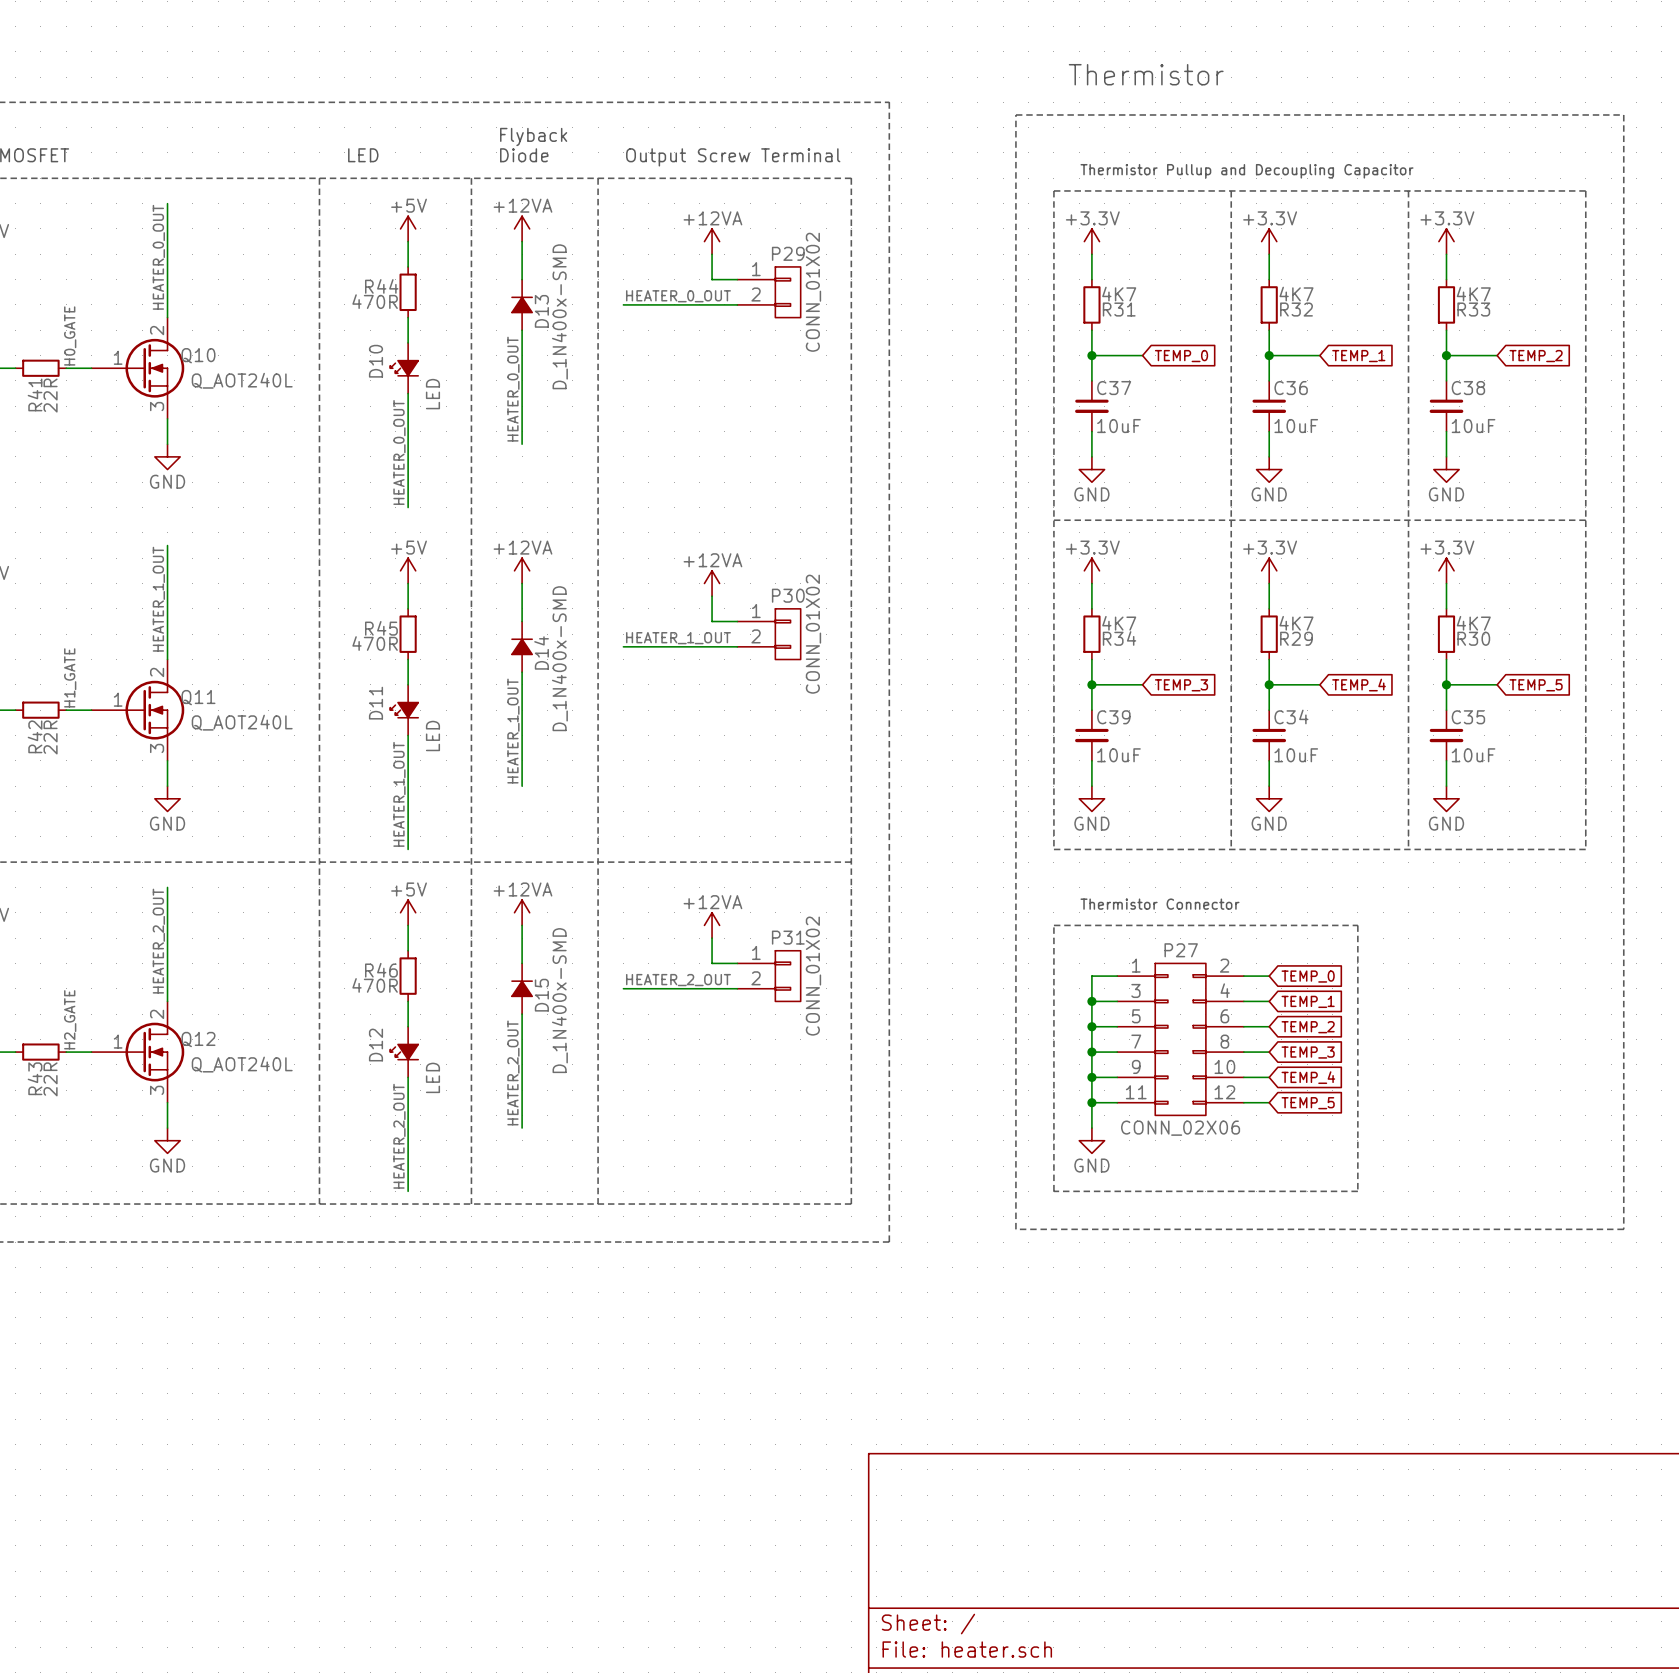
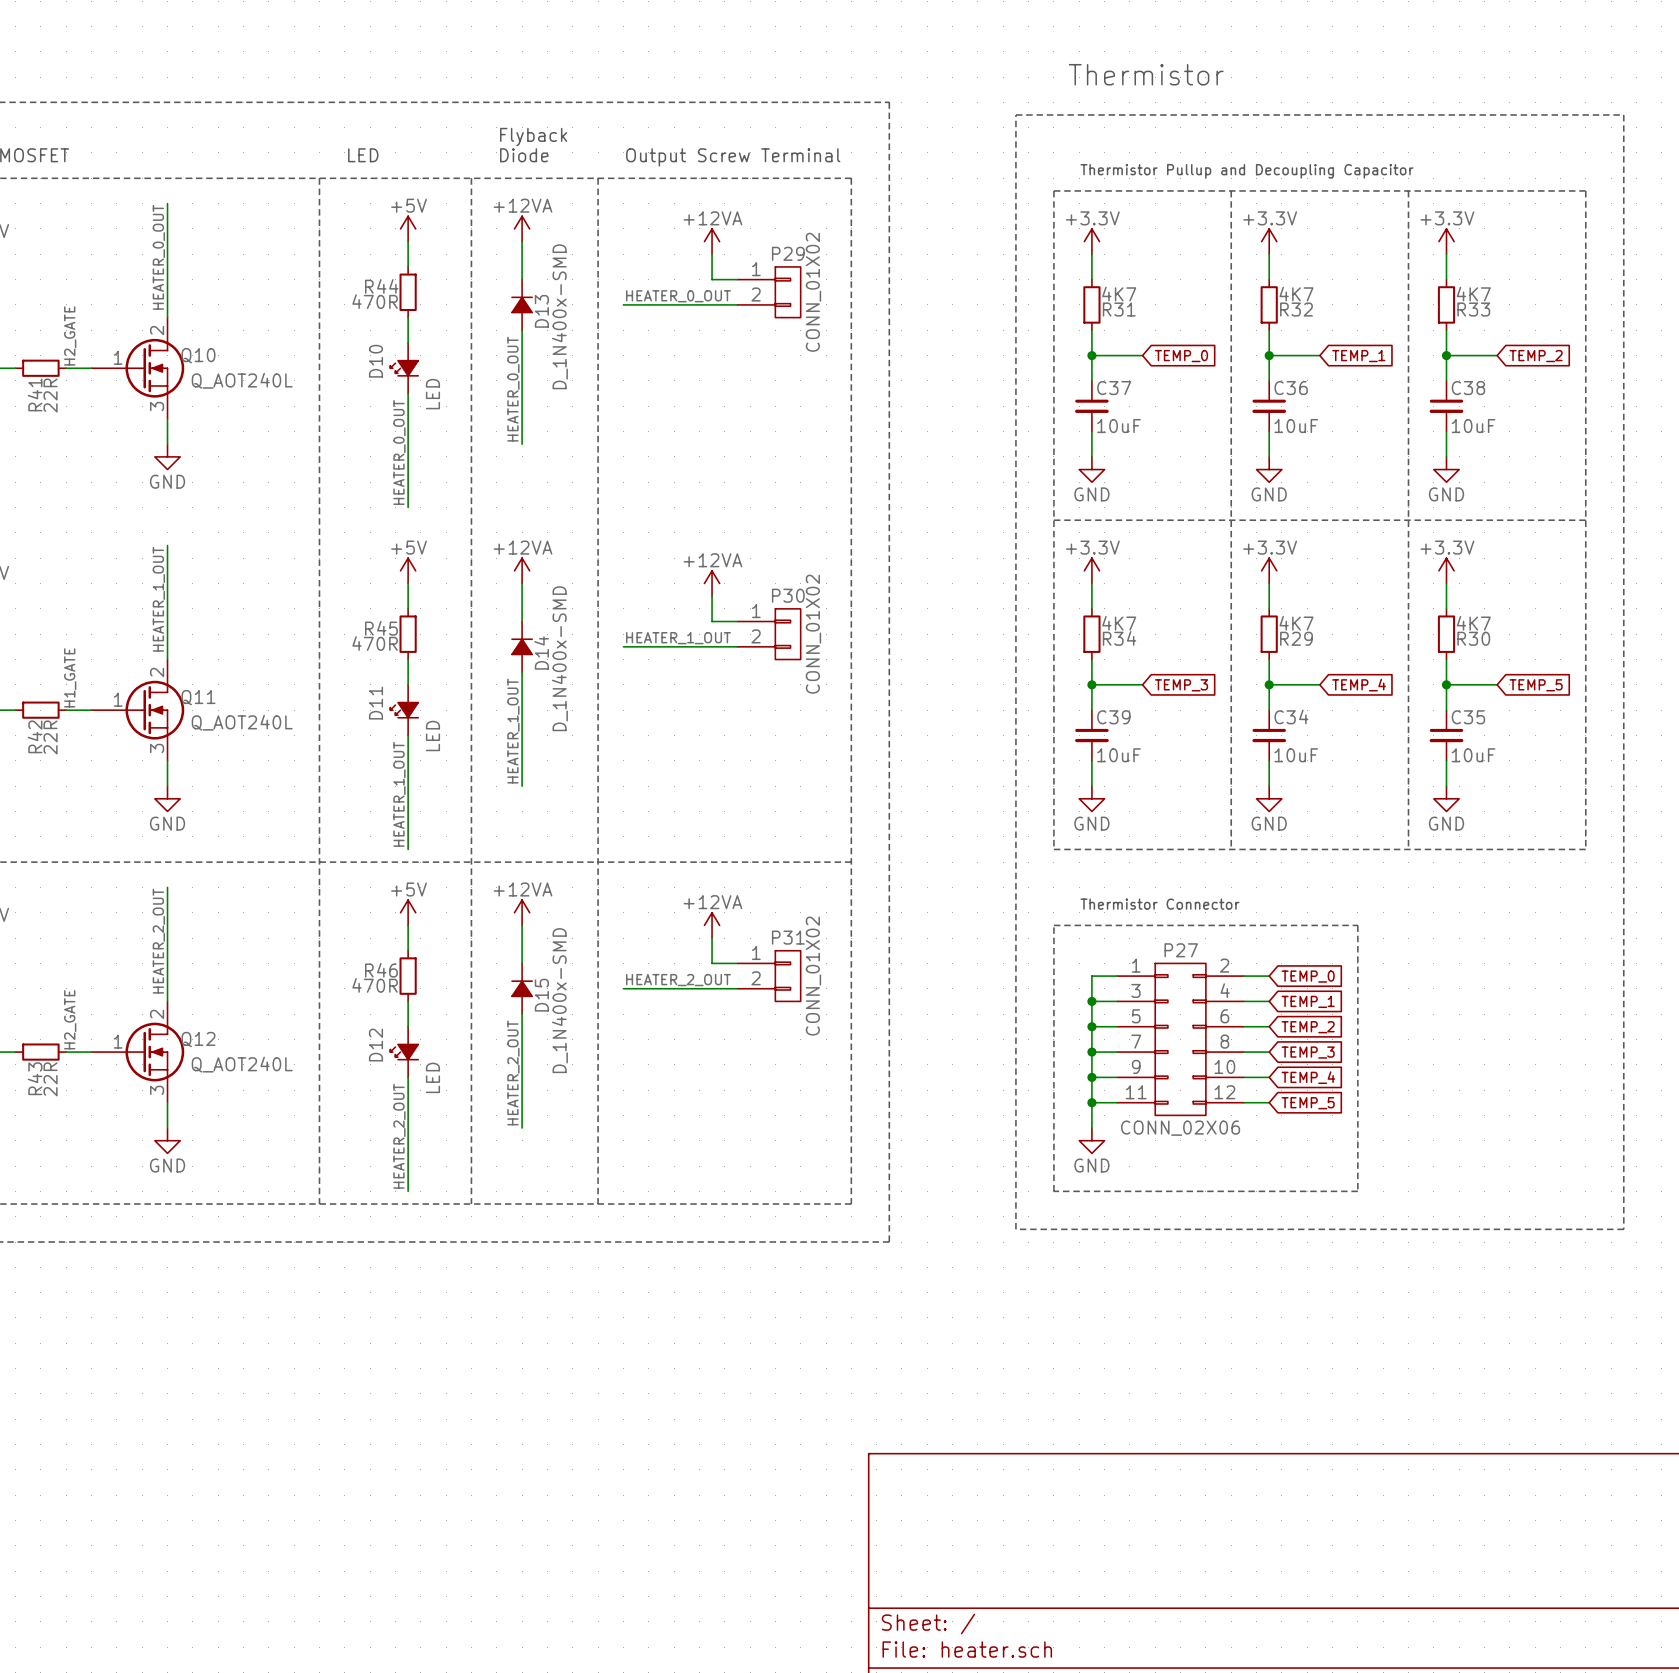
label: H0_GATE (70, 335) -> H2_GATE (70, 335)

